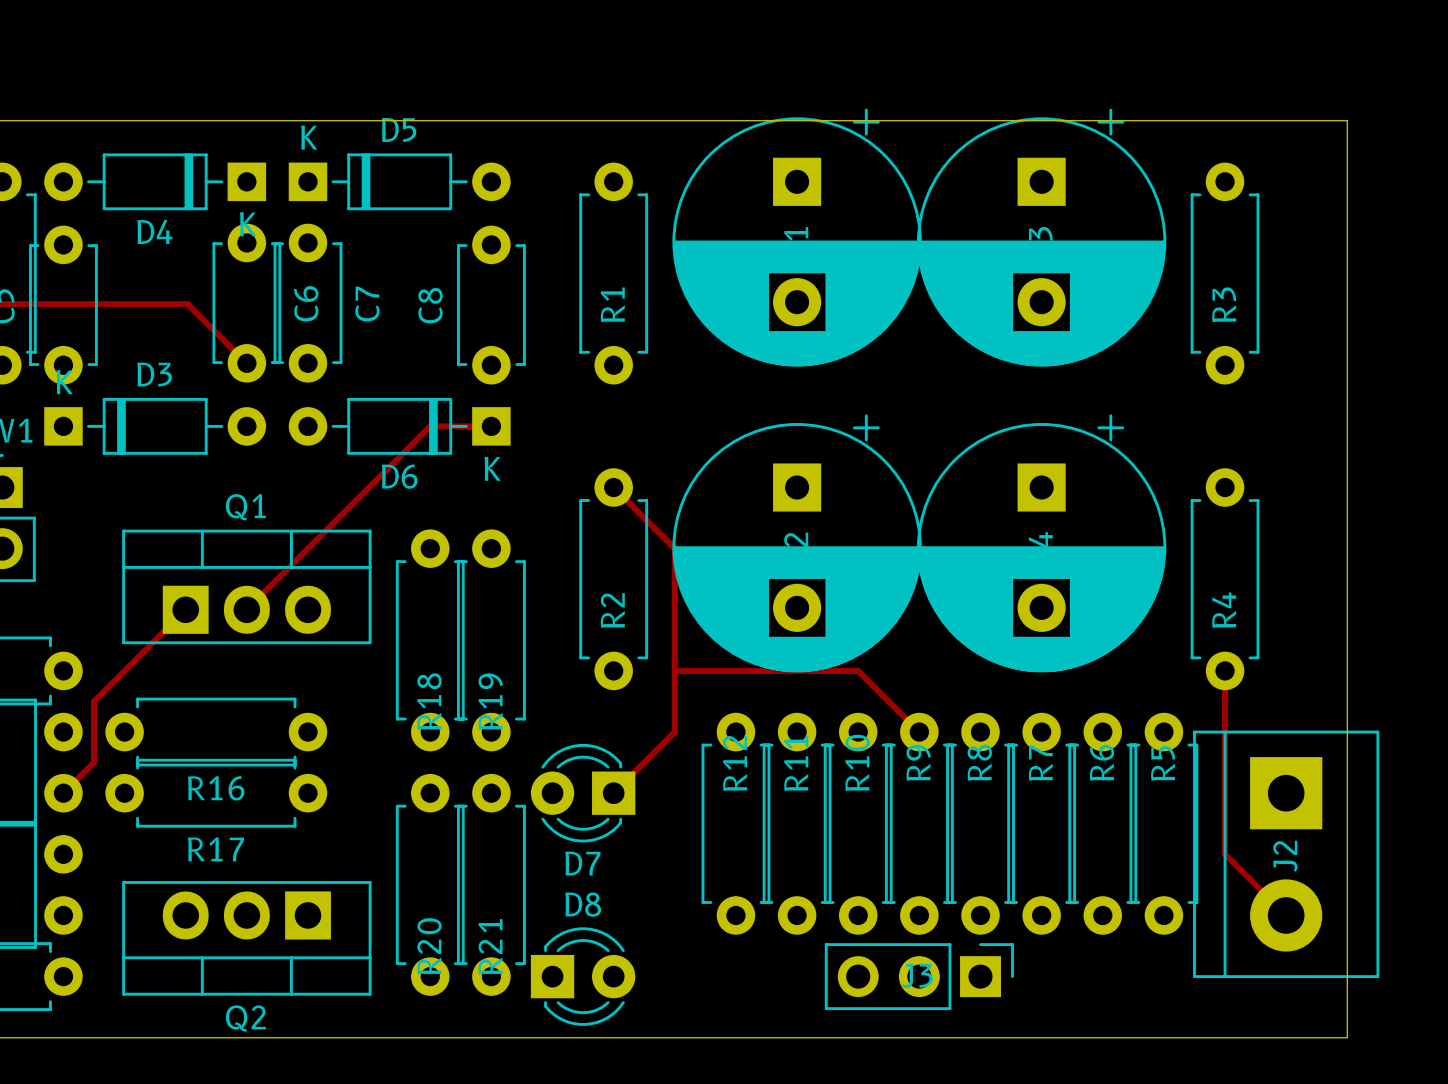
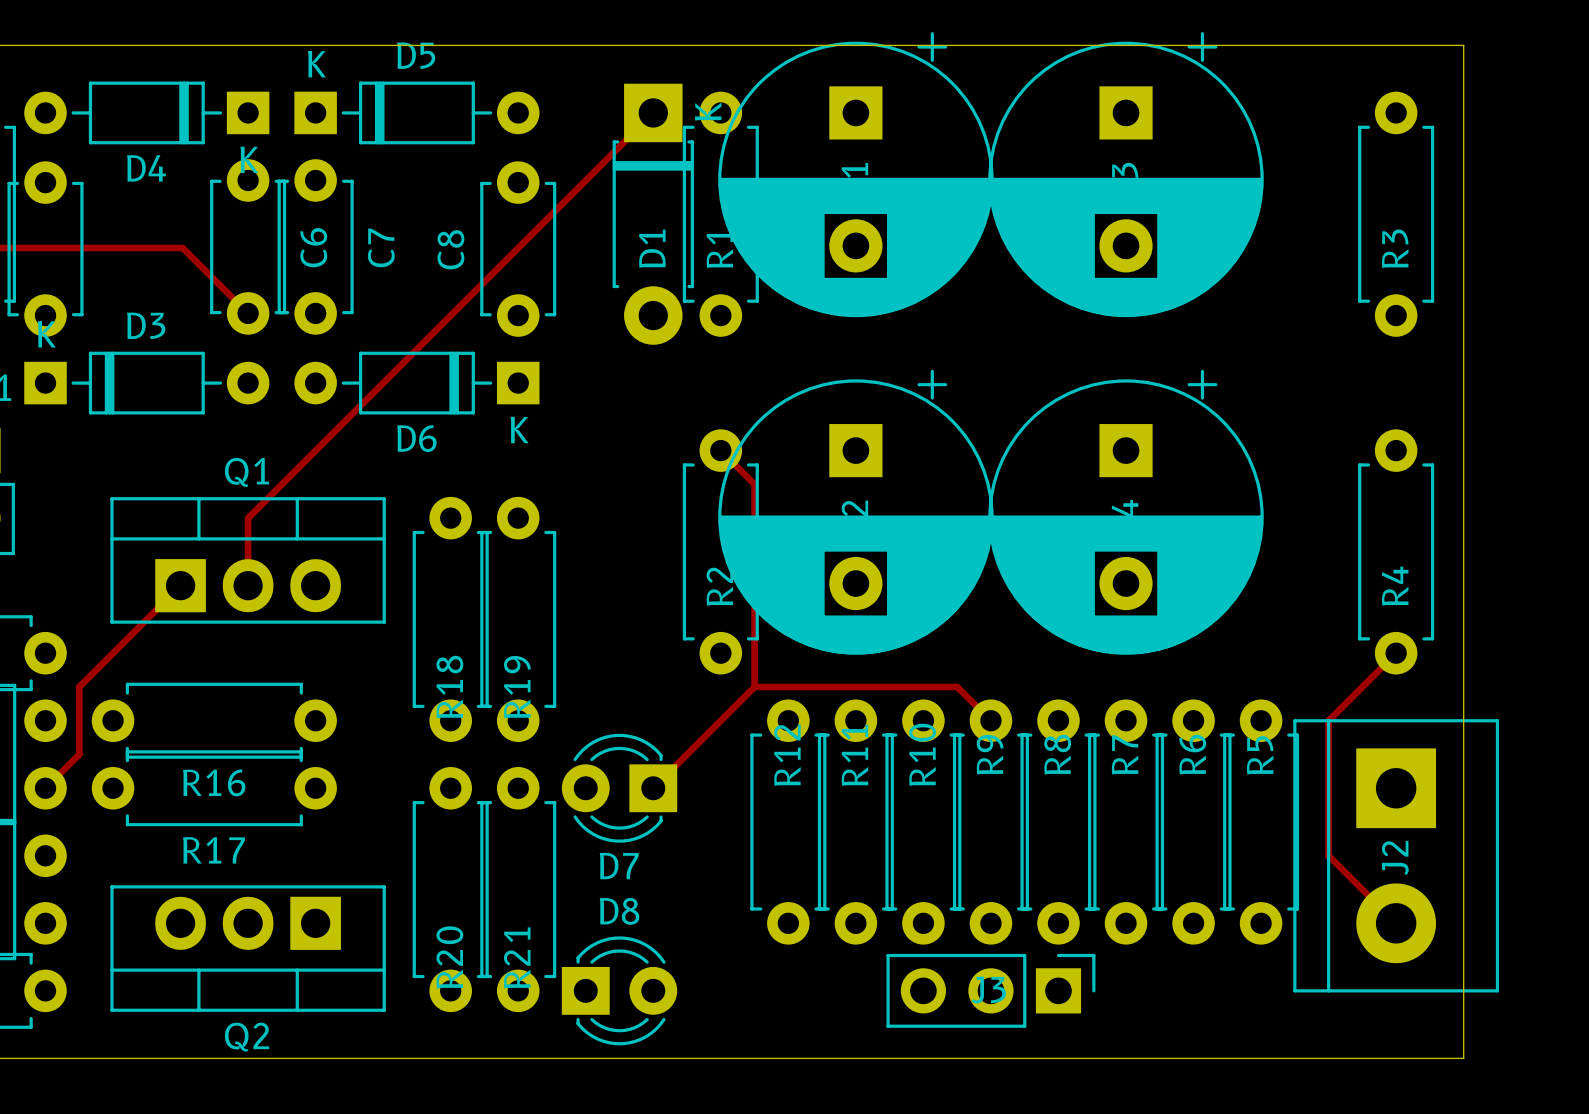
R1 position: (613, 273) -> (720, 214)
D1: none -> (653, 214)
R3 position: (1225, 273) -> (1396, 214)
track: (491, 426) (430, 426) (246, 609) -> (653, 112) (248, 518) (248, 585)
track: (613, 487) (674, 548) (674, 732) -> (754, 686) (720, 720)
track: none -> (720, 450) (754, 484) (754, 686)
R2 position: (613, 579) -> (720, 551)
R4 position: (1225, 579) -> (1396, 551)
track: (674, 670) (858, 670) (888, 701) -> (754, 686) (957, 686)
track: (1225, 670) (1225, 732) -> (1396, 653) (1328, 720)

